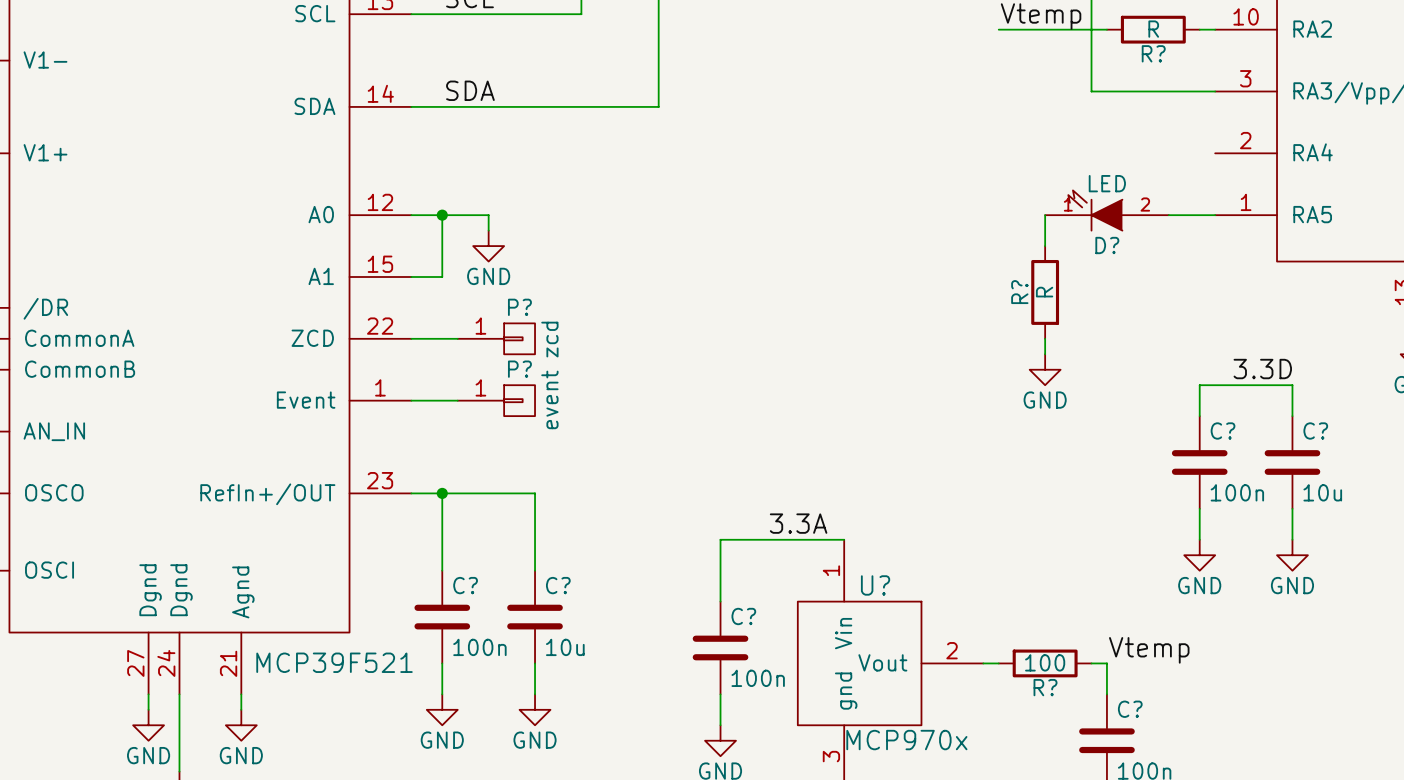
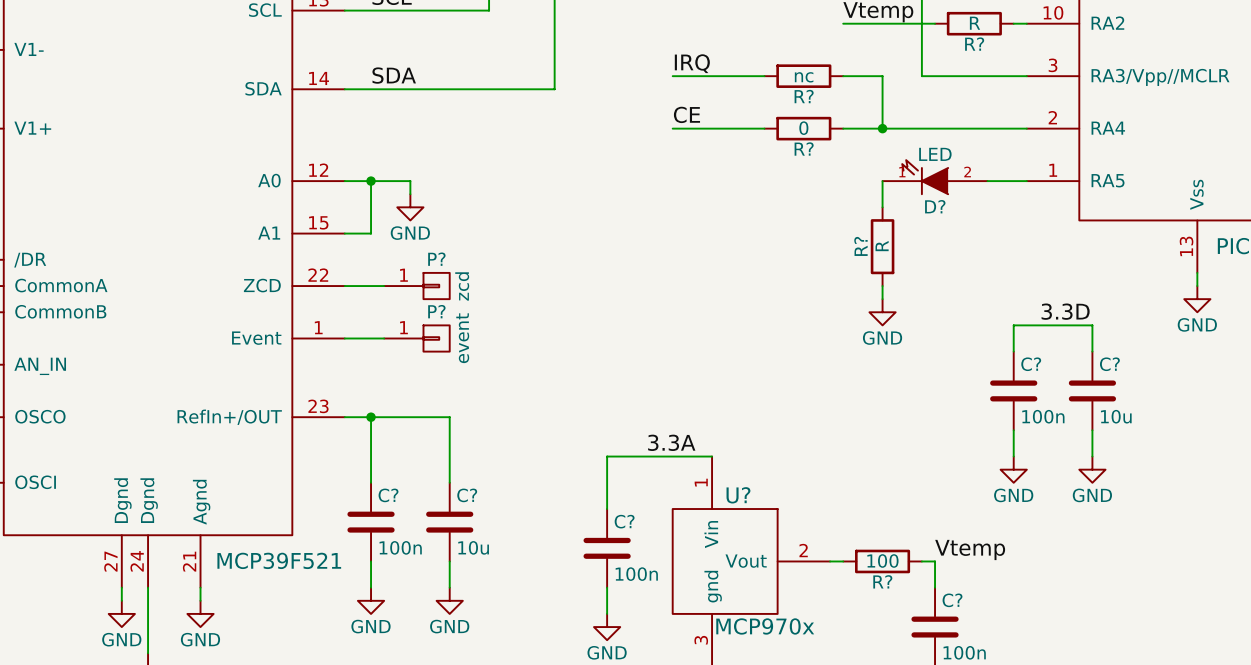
label: none -> IRQ (692, 63)
wire: none -> (672, 76) (764, 76)
R?: none -> nc (803, 76)
wire: none -> (843, 76) (882, 76) (882, 128)
label: none -> CE (686, 114)
wire: none -> (672, 128) (764, 128)
R?: none -> 0 (803, 128)
wire: none -> (843, 128) (1026, 128)
junction: none -> (882, 128)

